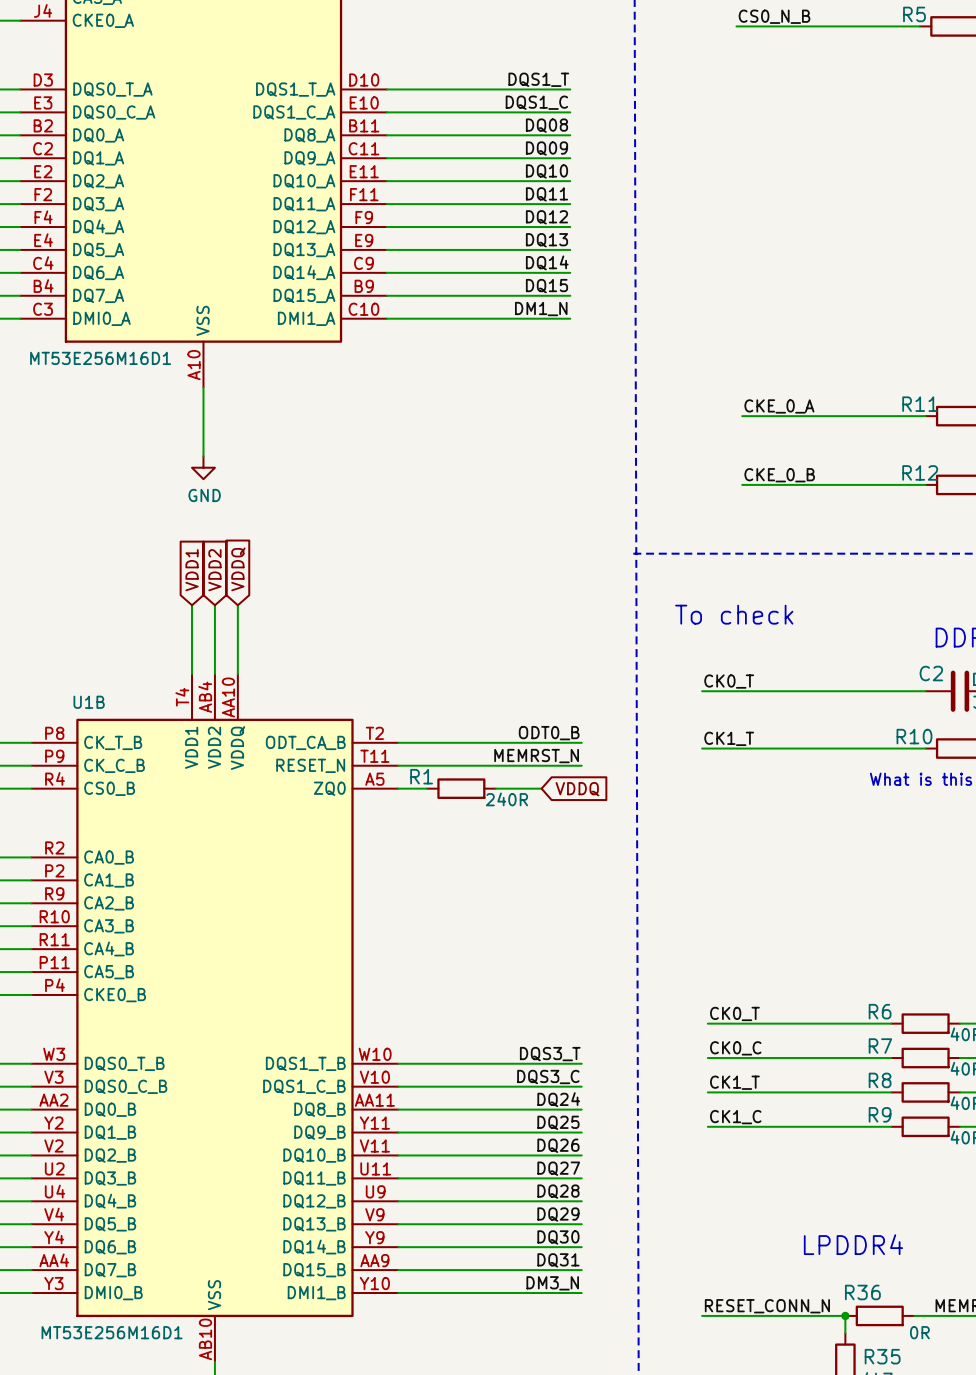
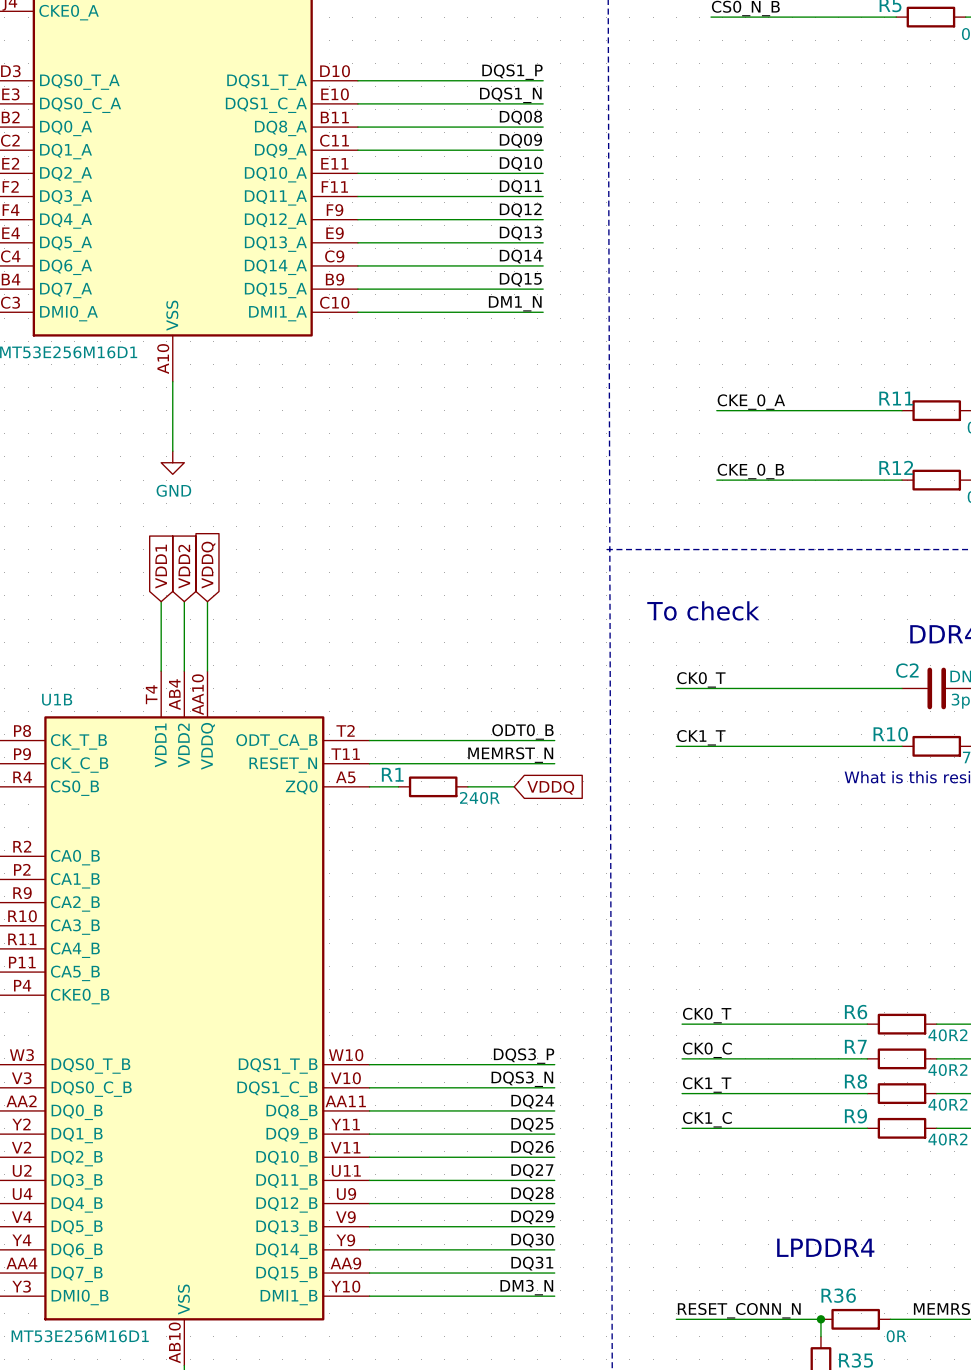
label: DQS1_T (538, 79) -> DQS1_P (512, 72)
label: DQS1_C (536, 102) -> DQS1_N (510, 95)
label: DQS3_T (550, 1054) -> DQS3_P (524, 1056)
label: DQS3_C (548, 1077) -> DQS3_N (522, 1079)

